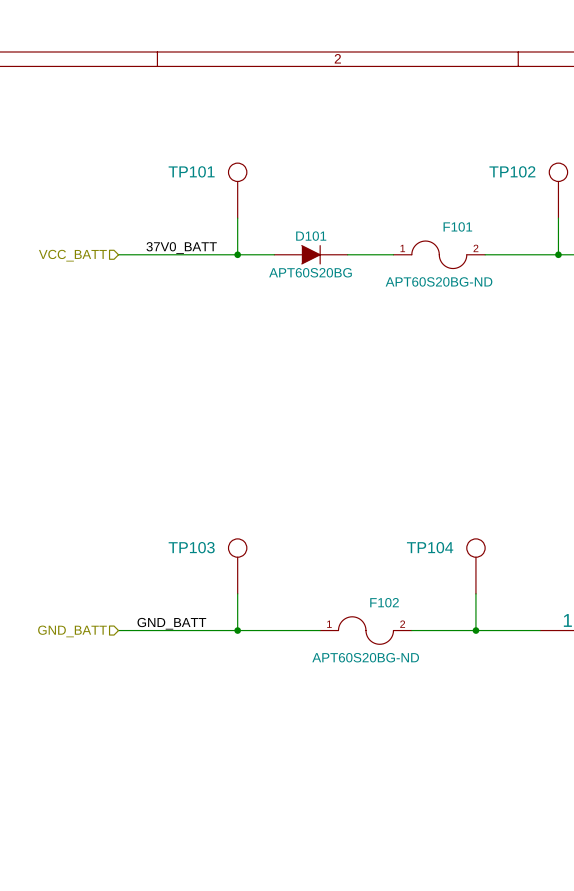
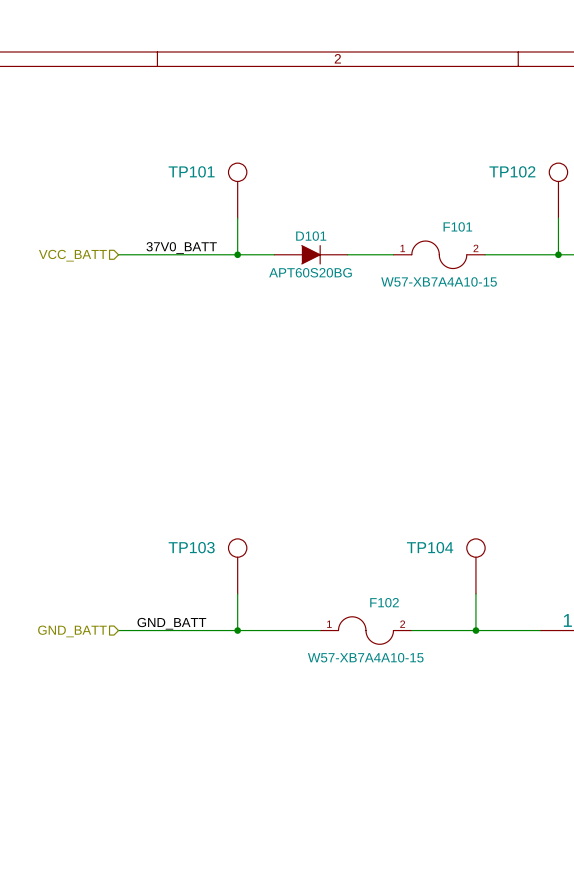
F101 value: APT60S20BG-ND (439, 281) -> W57-XB7A4A10-15 (439, 281)
F102 value: APT60S20BG-ND (365, 657) -> W57-XB7A4A10-15 (365, 657)

